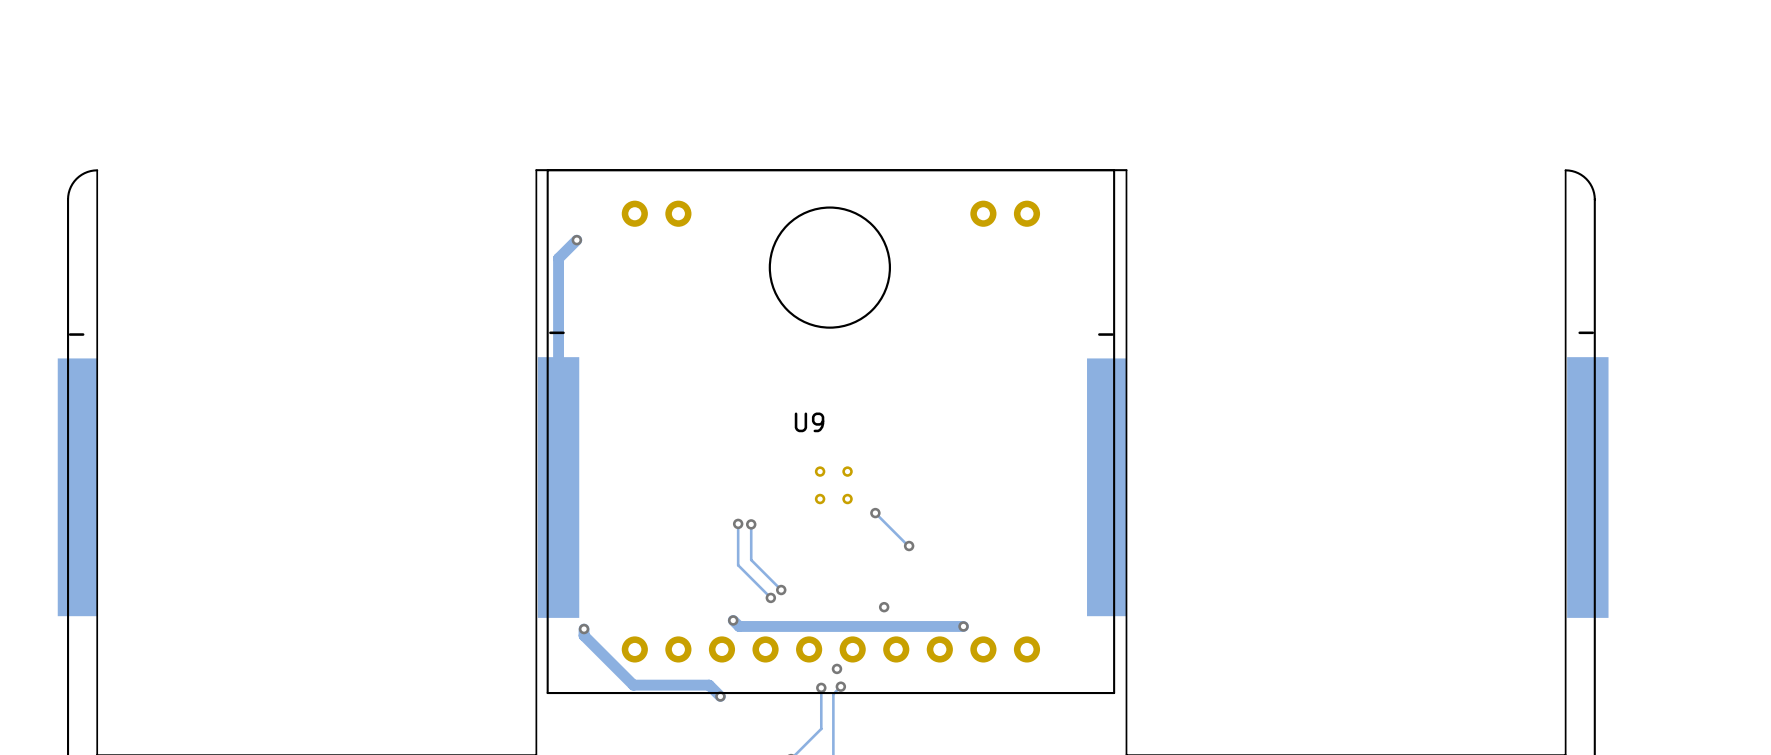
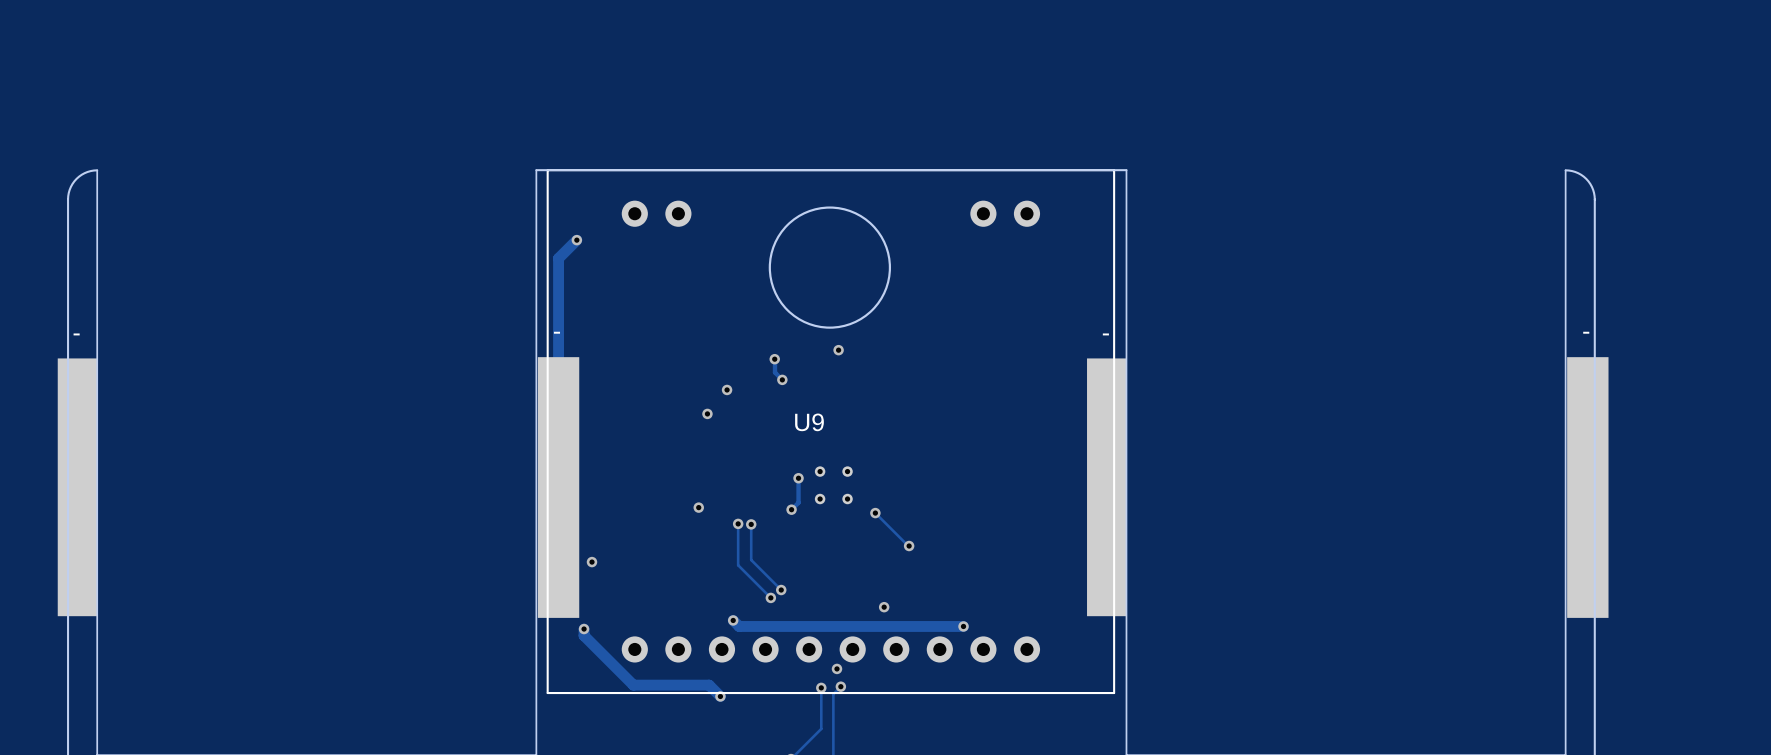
via: none -> (838, 350)
track: none -> (774, 359) (774, 372) (782, 379)
via: none -> (774, 359)
via: none -> (782, 379)
via: none -> (727, 389)
via: none -> (707, 413)
track: none -> (798, 478) (798, 502) (791, 509)
via: none -> (798, 478)
via: none -> (698, 507)
via: none -> (791, 509)
via: none -> (591, 562)

